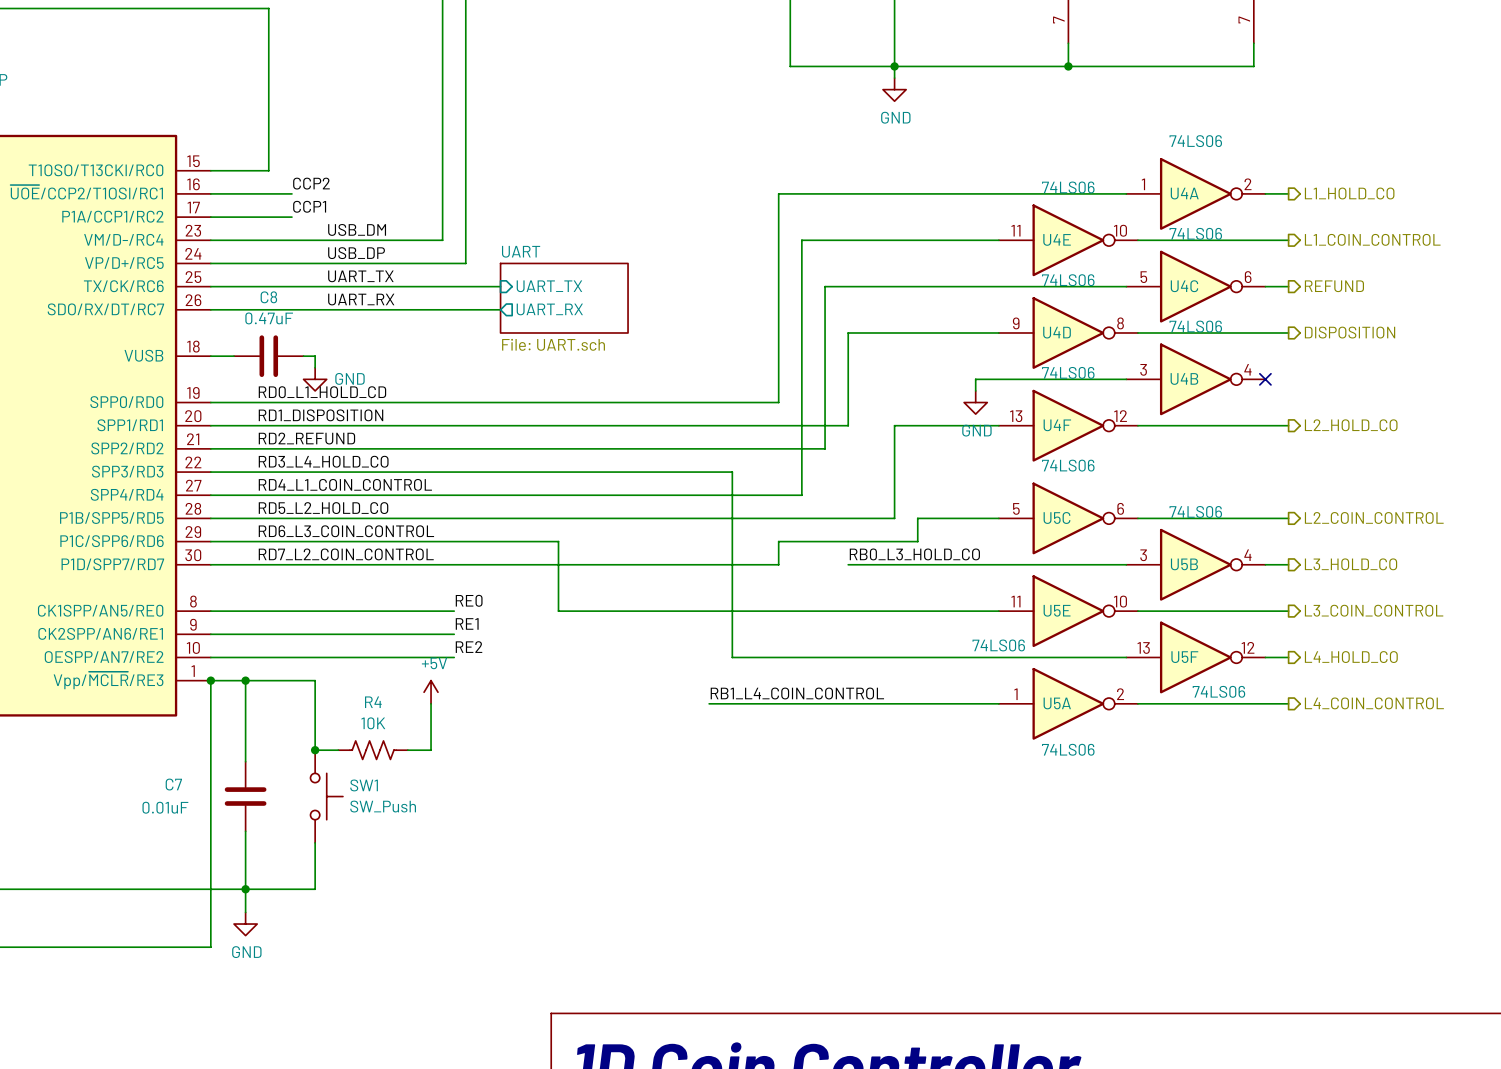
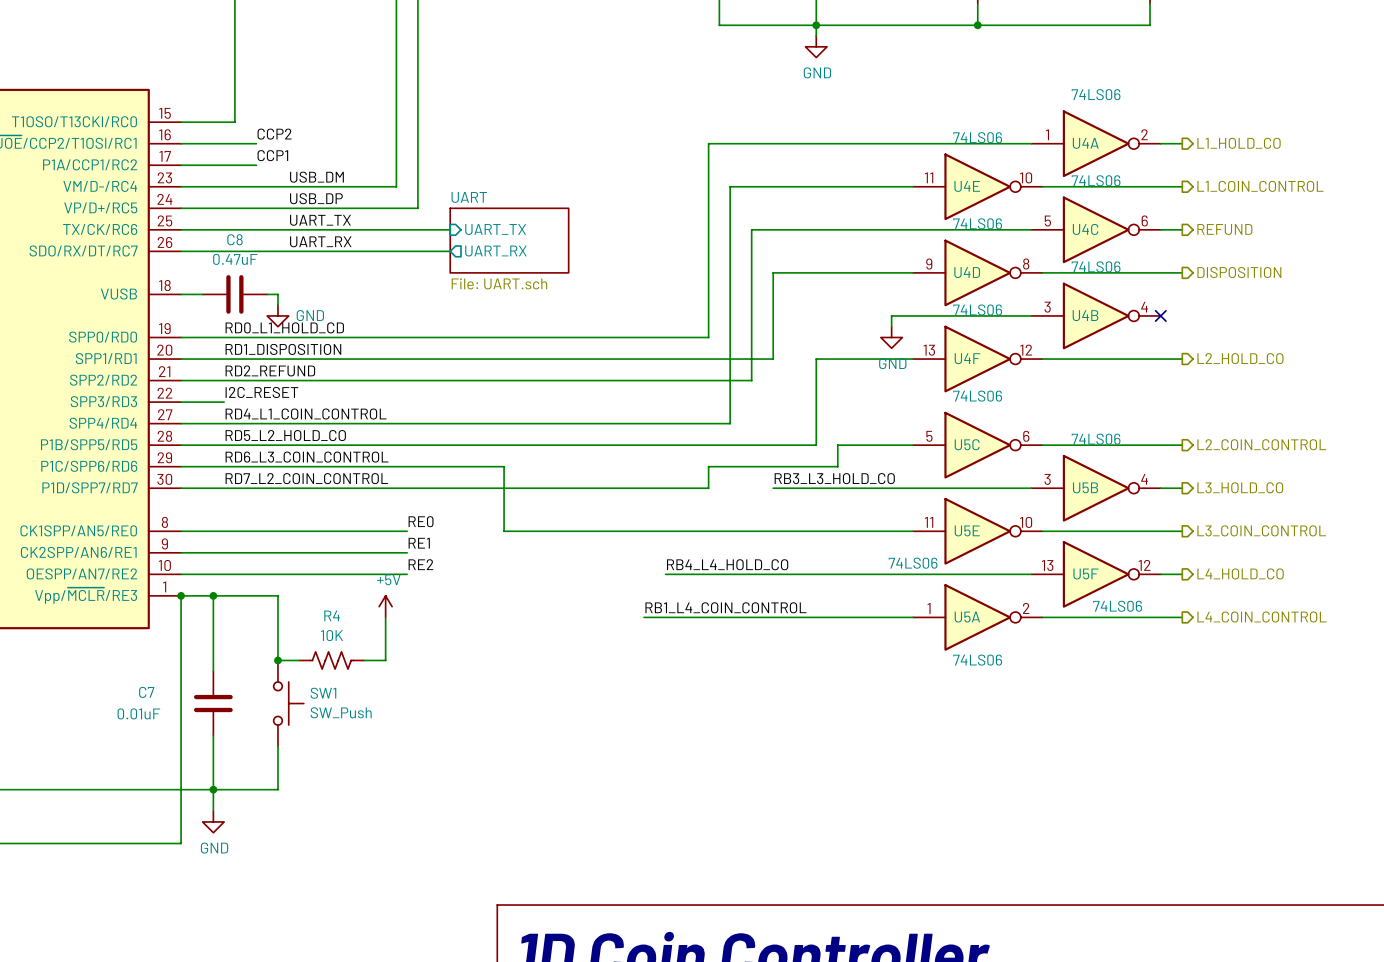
label: RD3_L4_HOLD_CO (323, 461) -> I2C_RESET (261, 392)
wire: (257, 472) (732, 472) (732, 657) -> none
label: RB0_L3_HOLD_CO (914, 554) -> RB3_L3_HOLD_CO (834, 478)
label: none -> RB4_L4_HOLD_CO (727, 564)

